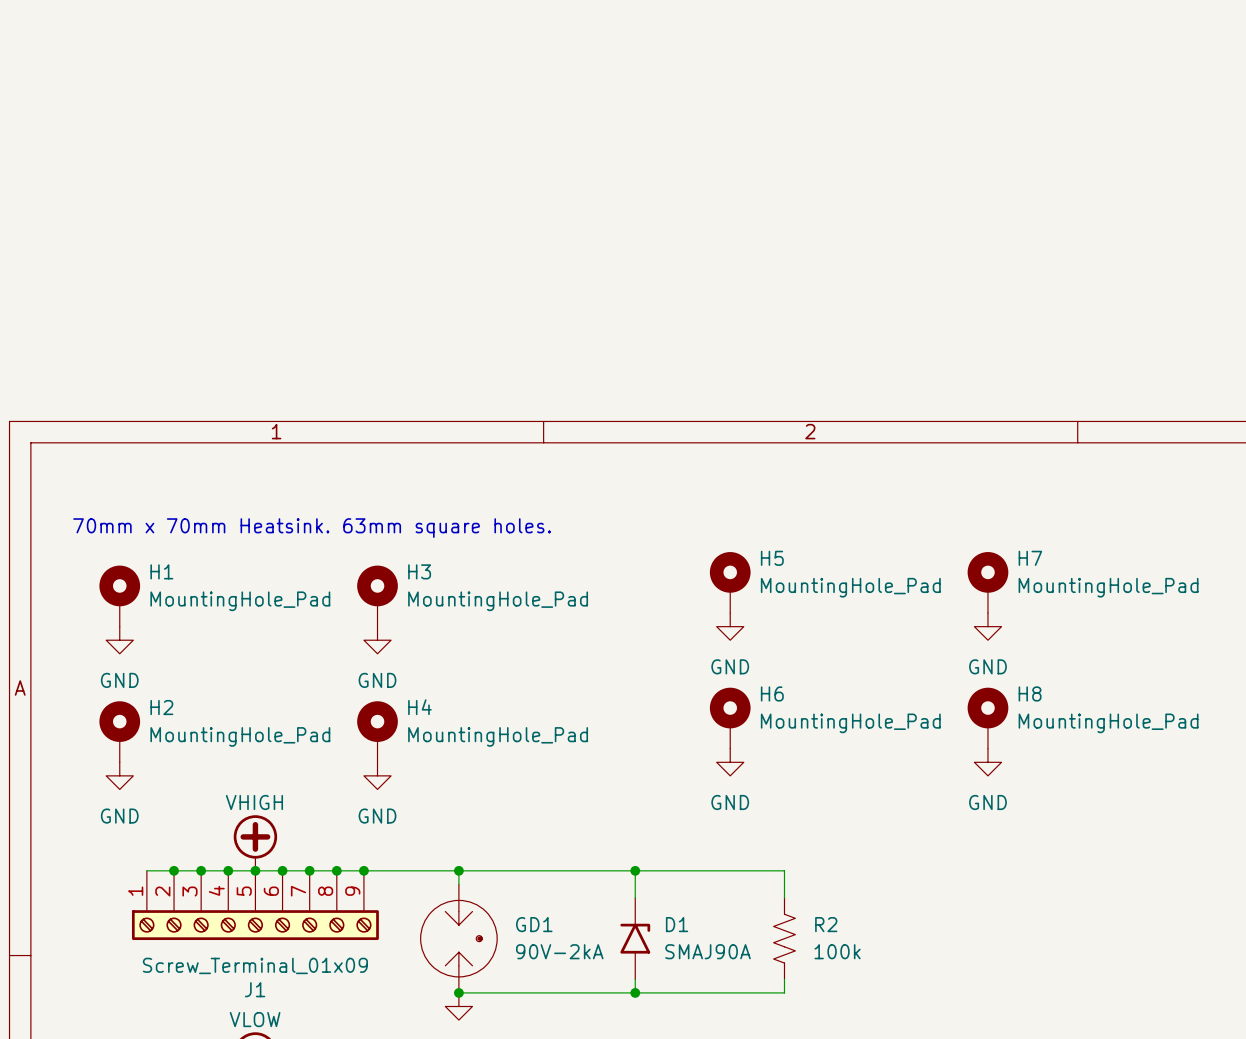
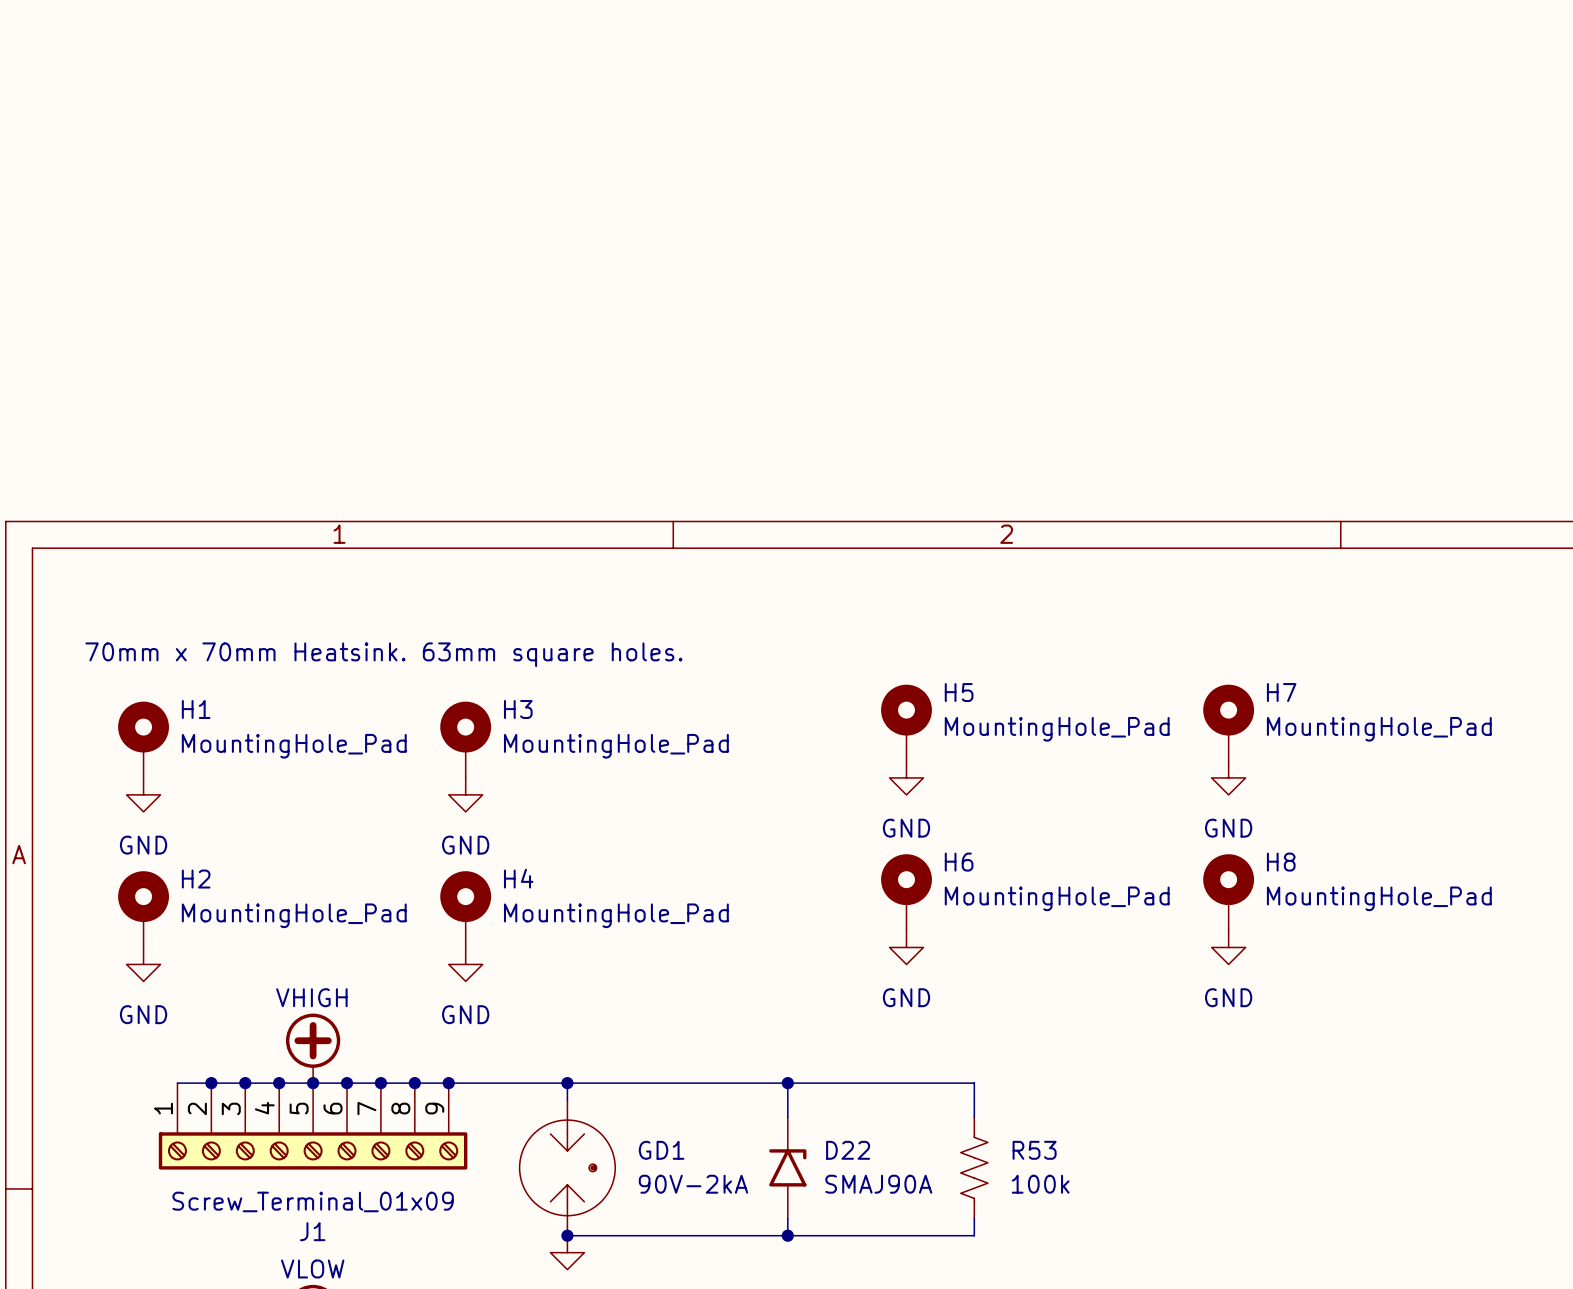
D1 name: D1 (677, 924) -> D22 (848, 1150)
R2 name: R2 (826, 924) -> R53 (1034, 1150)

